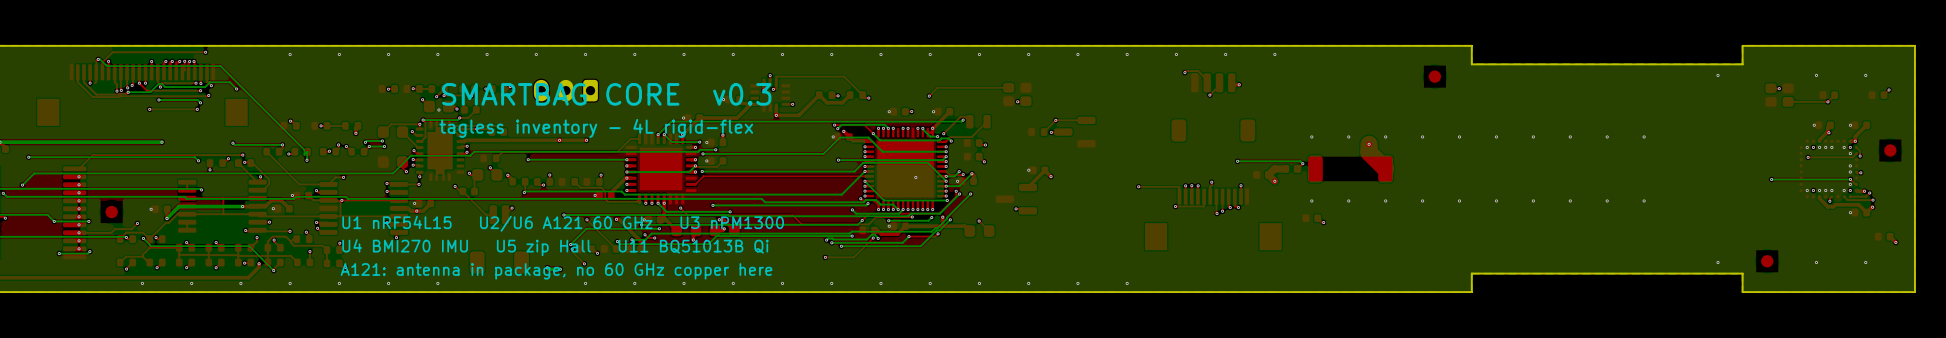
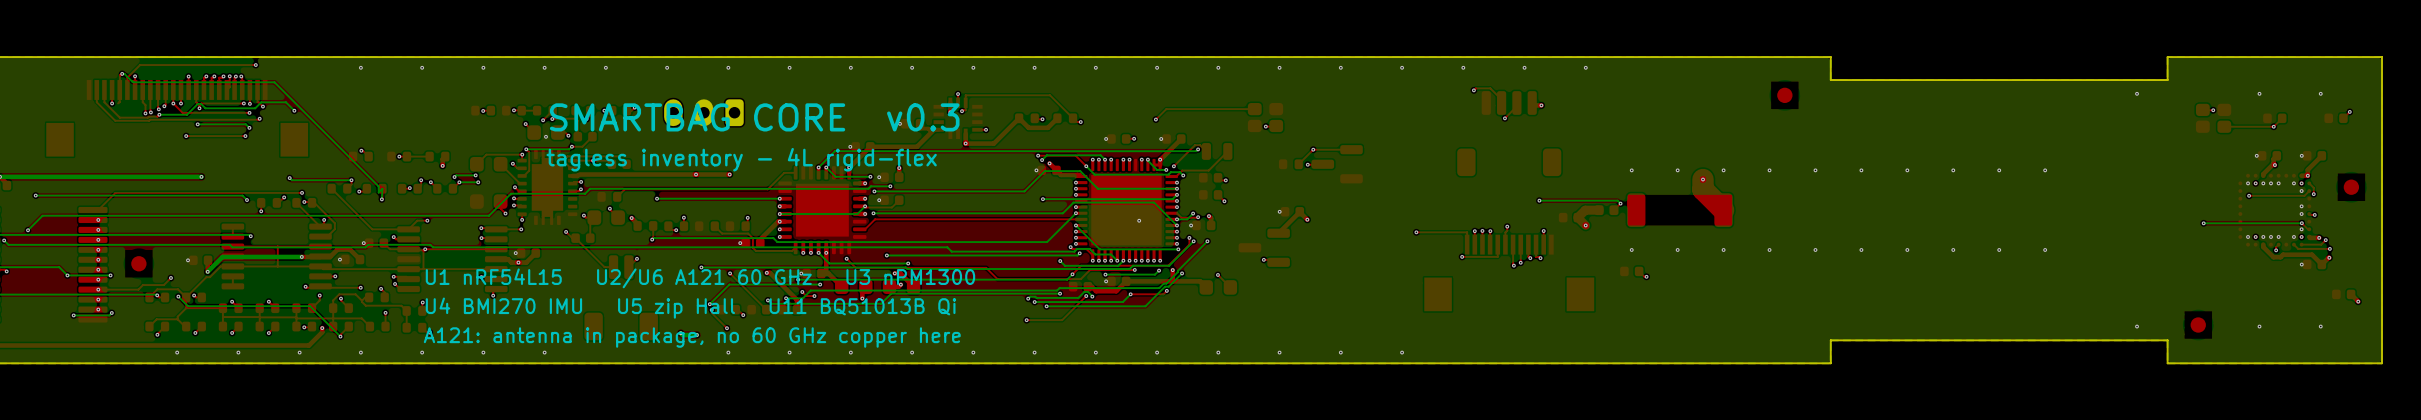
bottom track: (971, 173) (959, 186) (946, 186) -> none

